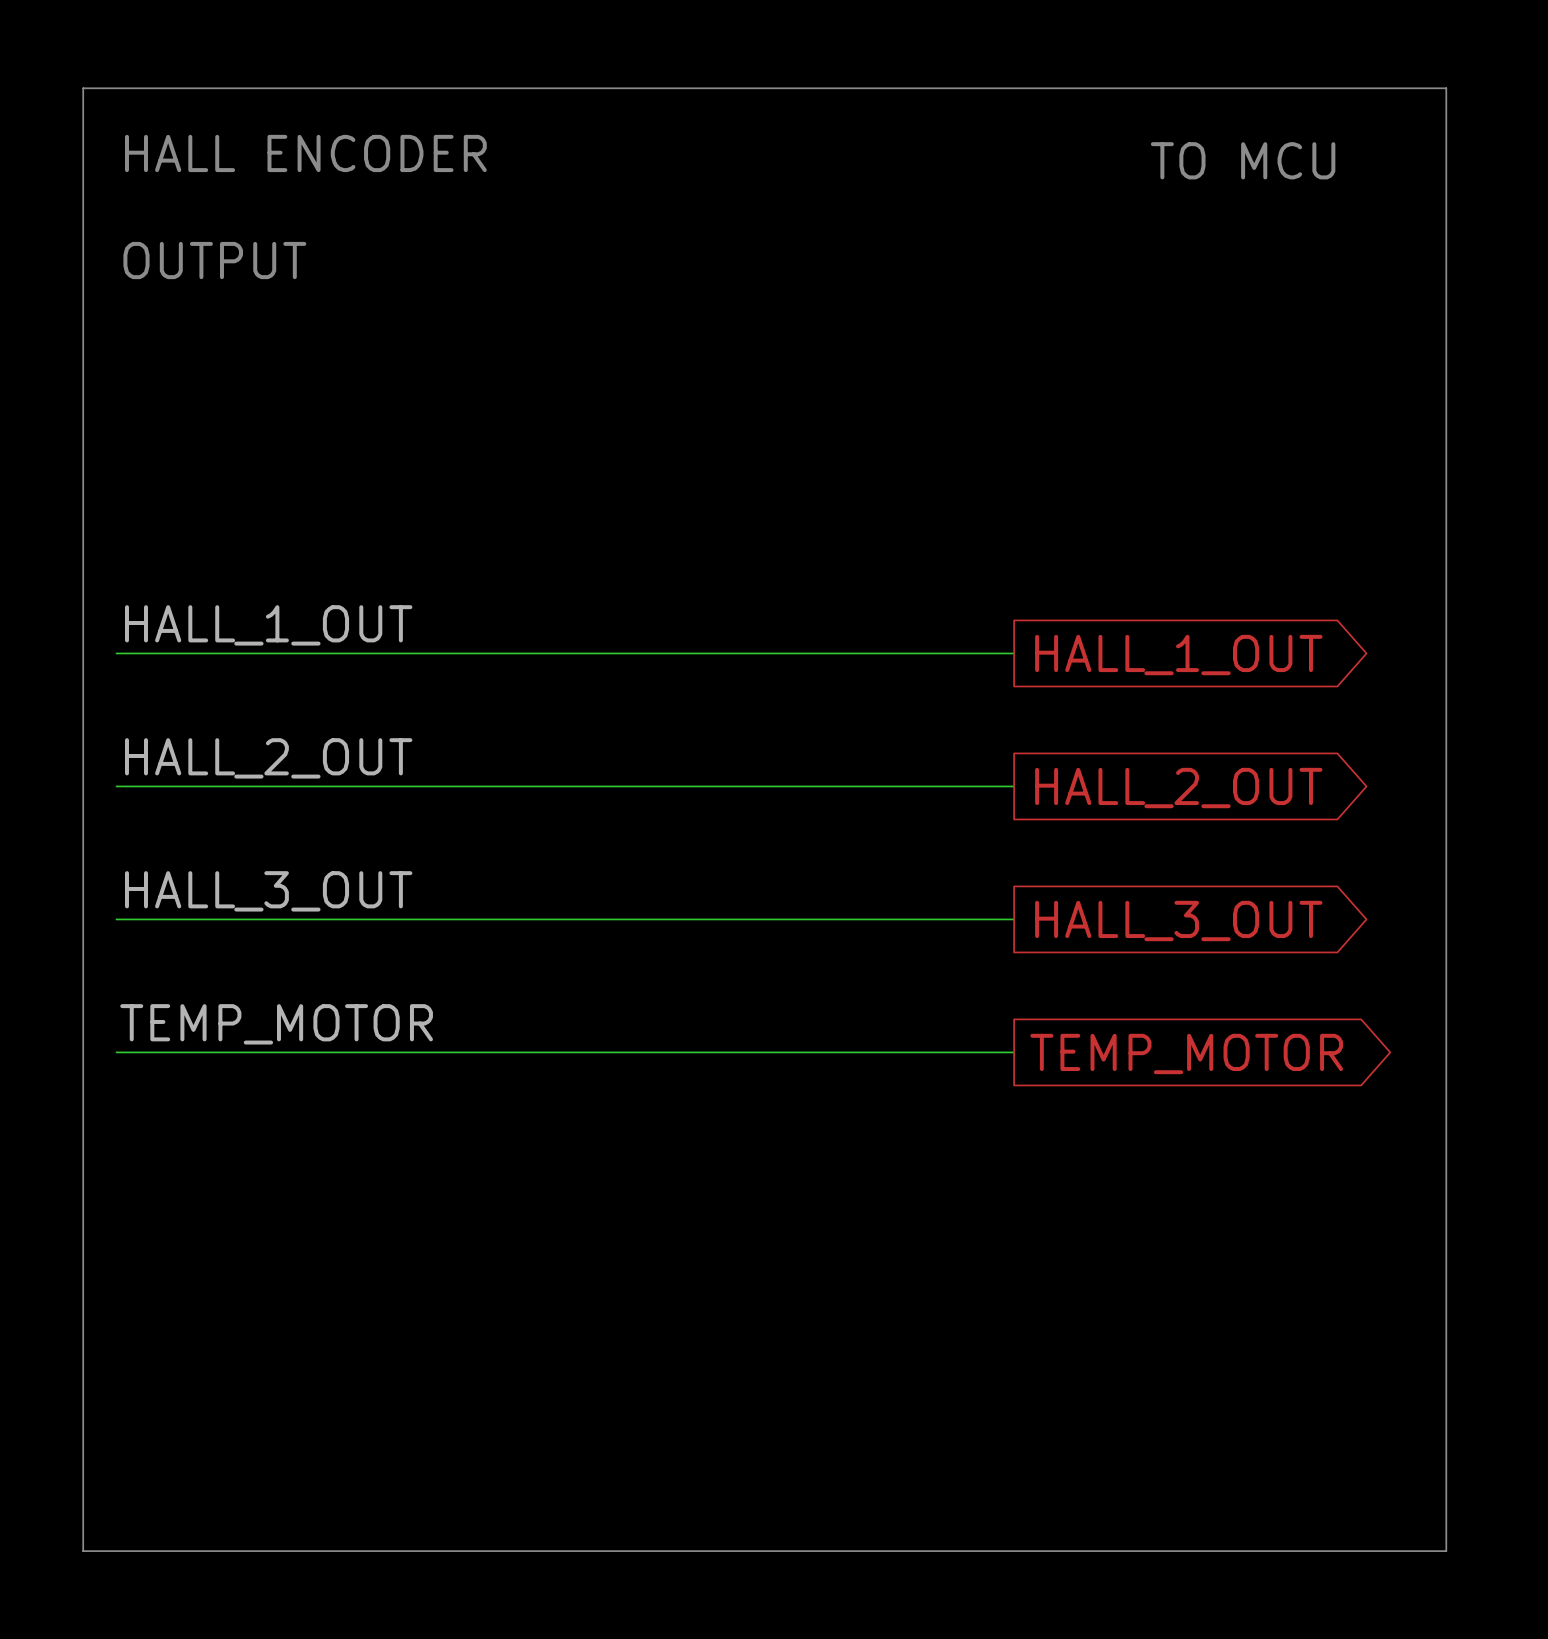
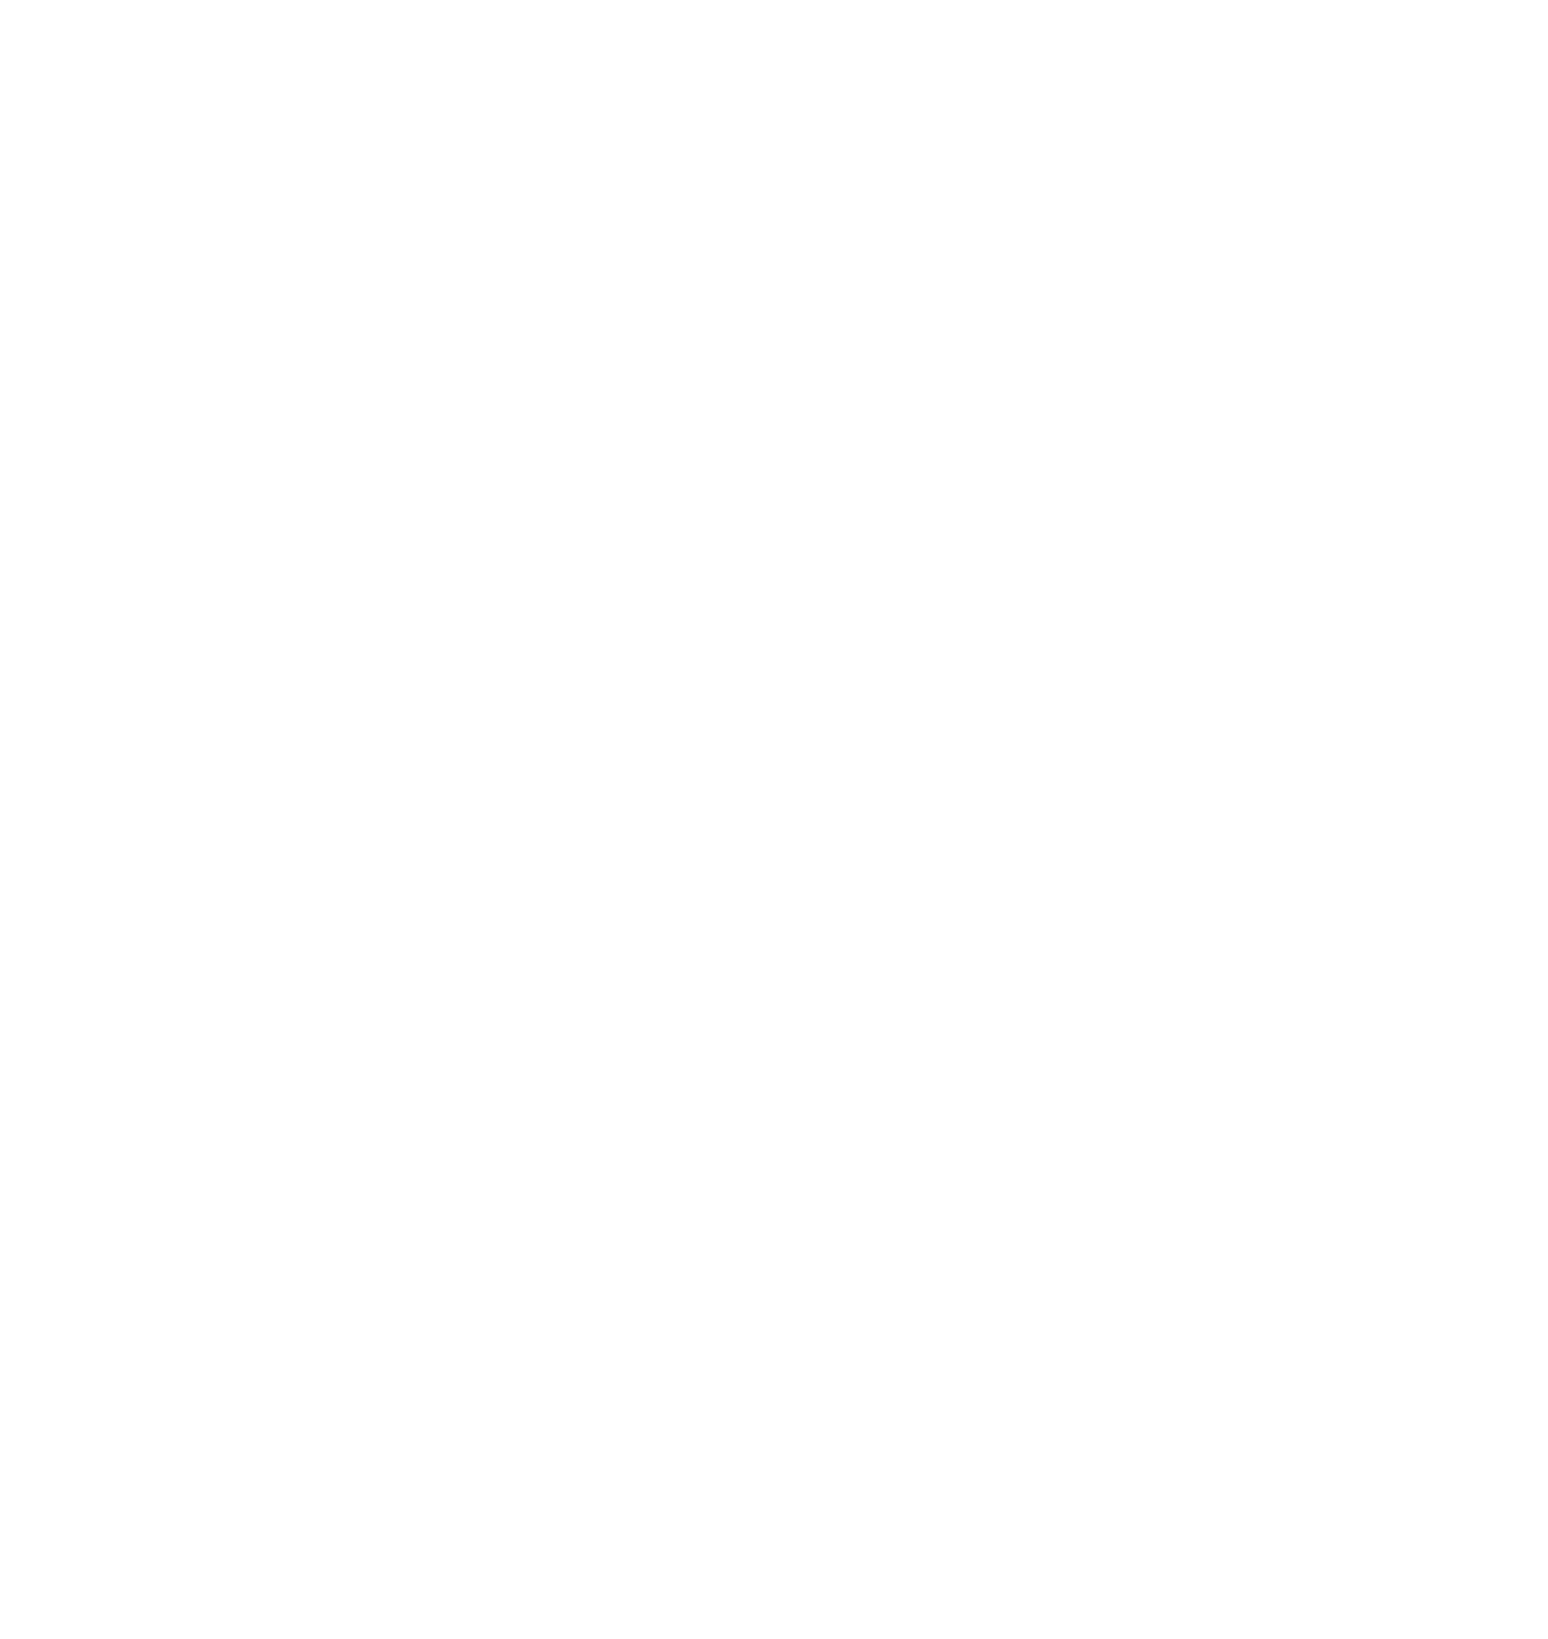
line: (83, 88) (1446, 88) (1446, 1551) (83, 1551) (83, 88) -> none
text: HALL ENCODER (305, 153) -> none
text: TO MCU (1243, 160) -> none
text: OUTPUT (214, 260) -> none
label: HALL_1_OUT (268, 625) -> none
wire: (116, 653) (1014, 653) -> none
global label: HALL_1_OUT (1178, 655) -> none
label: HALL_2_OUT (268, 758) -> none
wire: (116, 786) (1014, 786) -> none
global label: HALL_2_OUT (1178, 788) -> none
label: HALL_3_OUT (268, 891) -> none
wire: (116, 919) (1014, 919) -> none
global label: HALL_3_OUT (1178, 921) -> none
label: TEMP_MOTOR (276, 1024) -> none
wire: (116, 1052) (1014, 1052) -> none
global label: TEMP_MOTOR (1186, 1054) -> none

